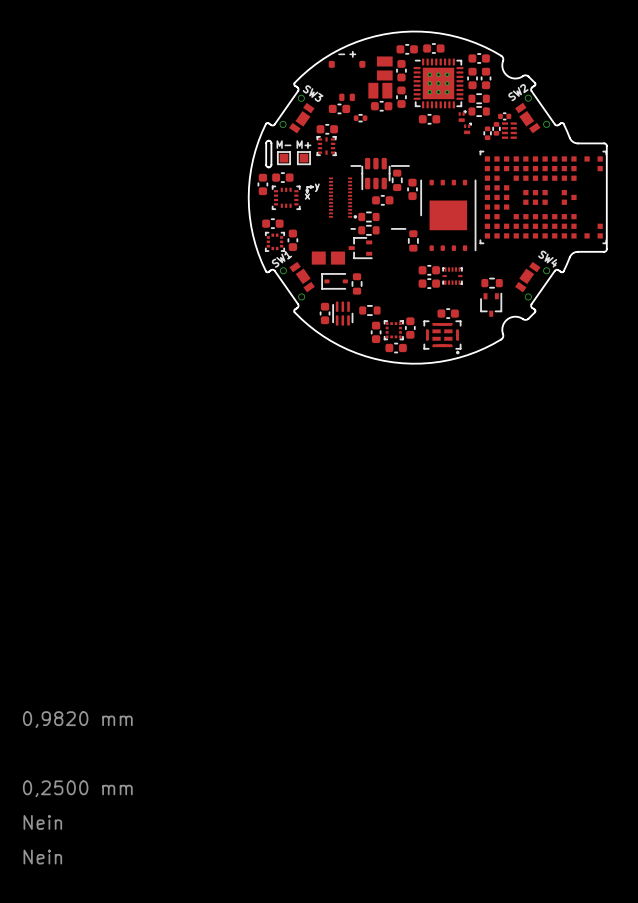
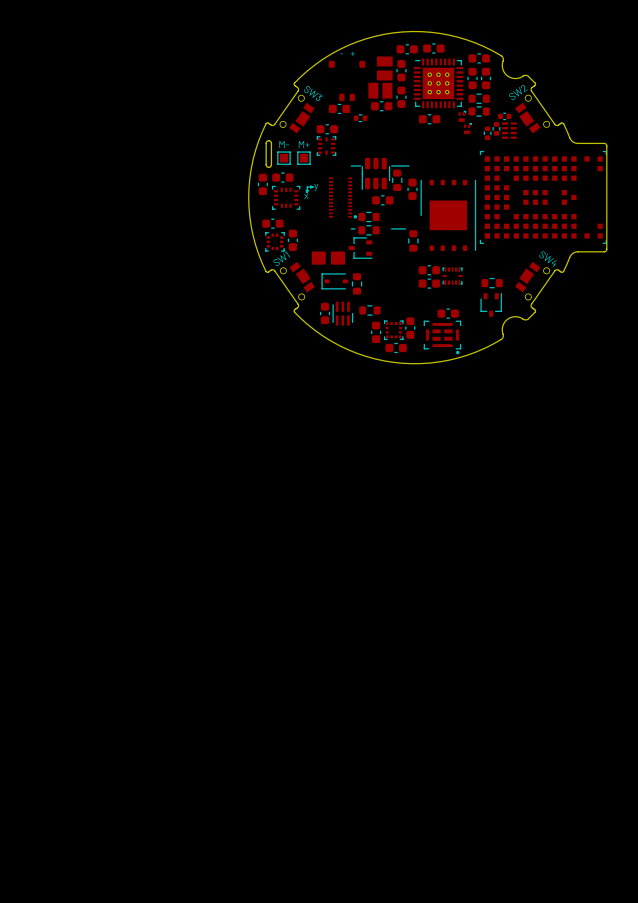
text: 0,9820 mm (77, 719) -> none
text: 0,2500 mm (77, 788) -> none
text: Nein (42, 822) -> none
text: Nein (42, 857) -> none

